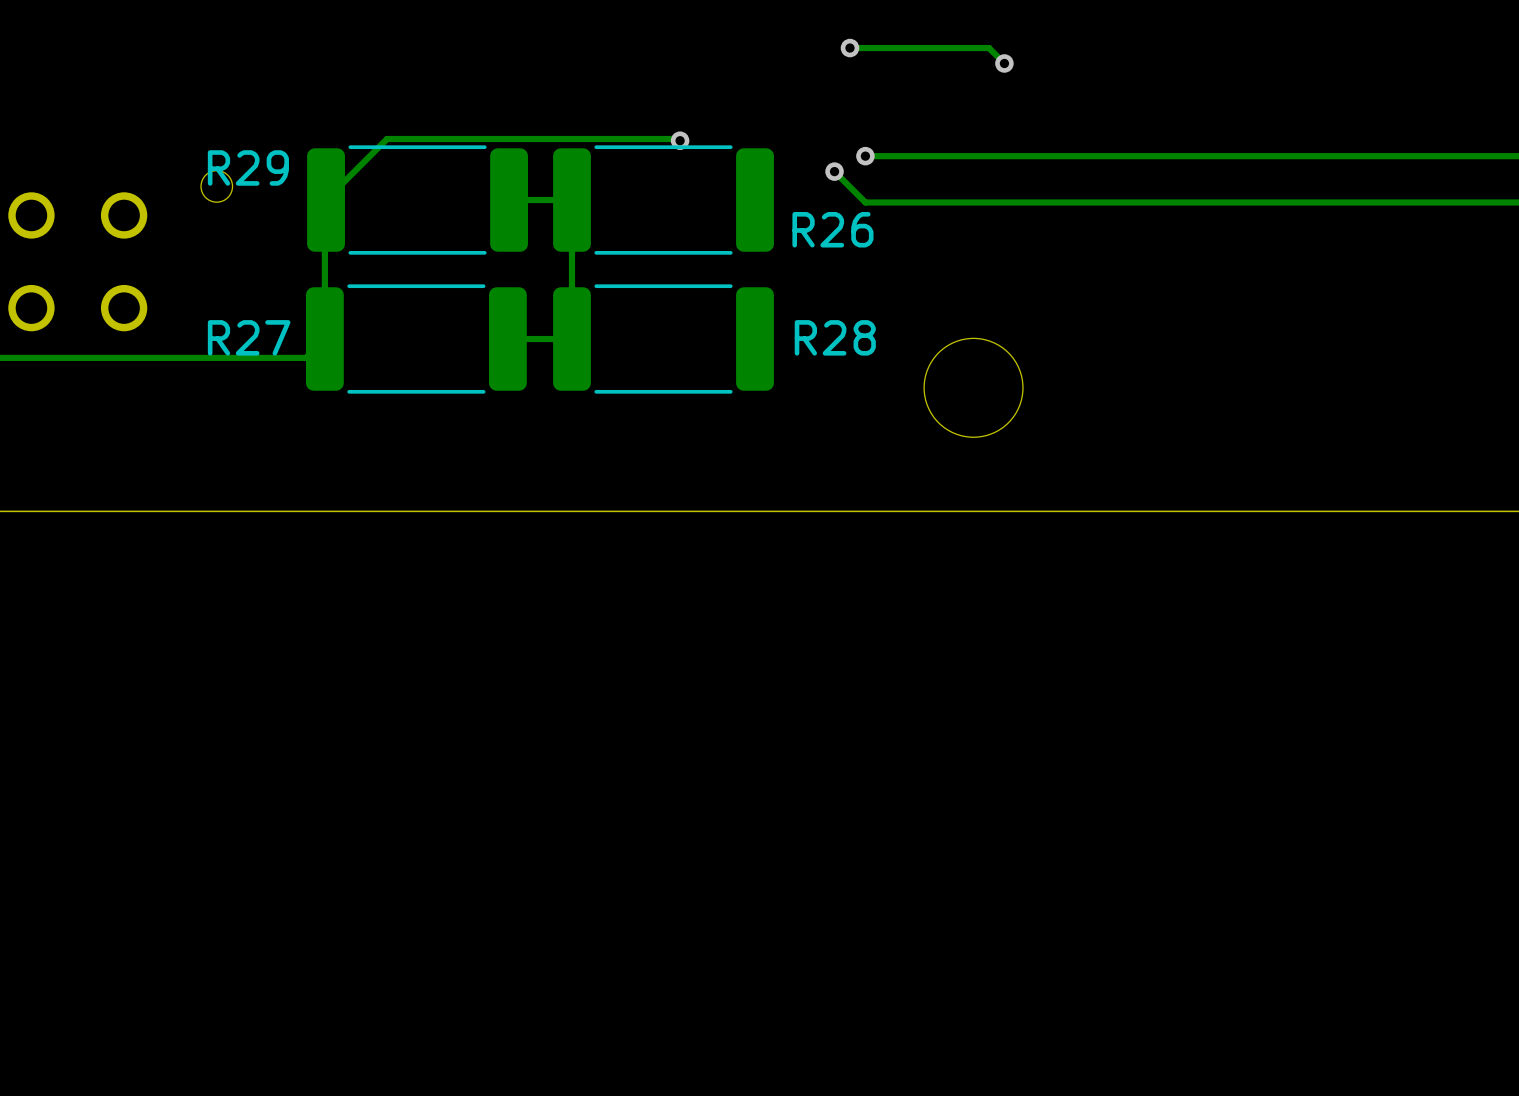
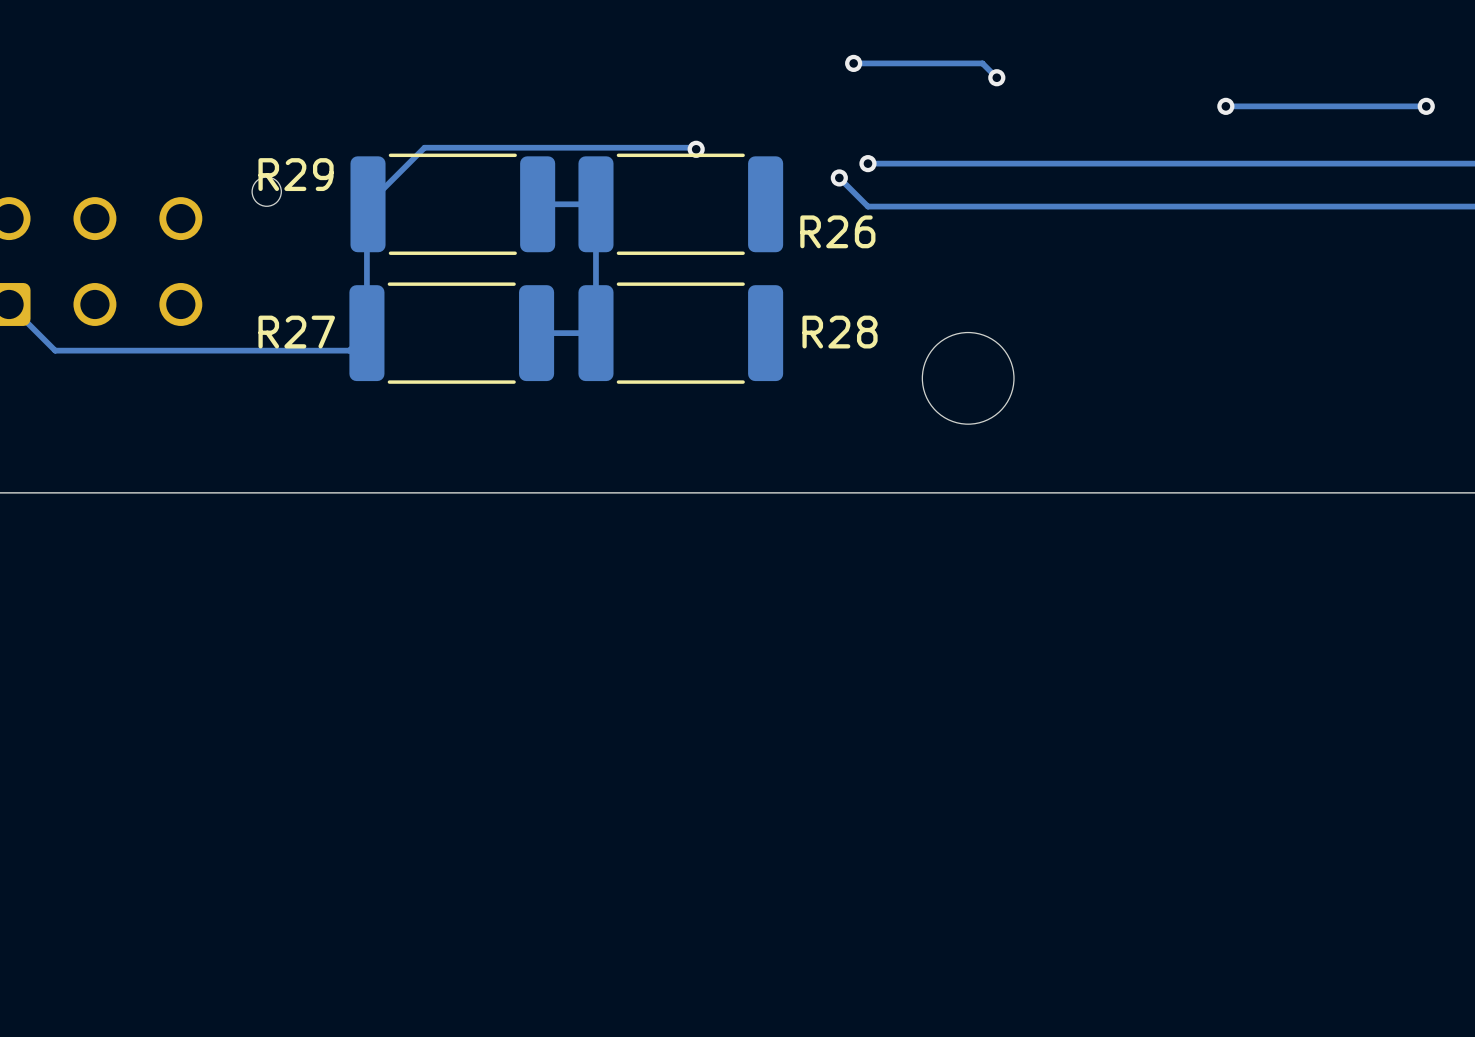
via: none -> (1225, 106)
track: none -> (1426, 106) (1225, 106)
via: none -> (1426, 106)

